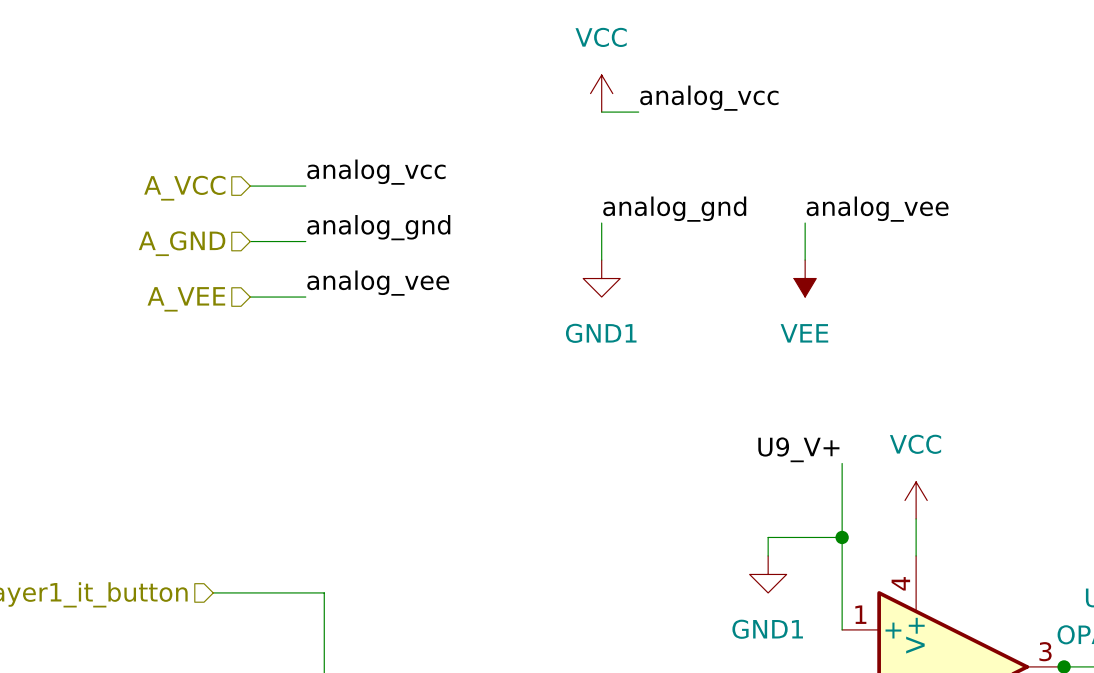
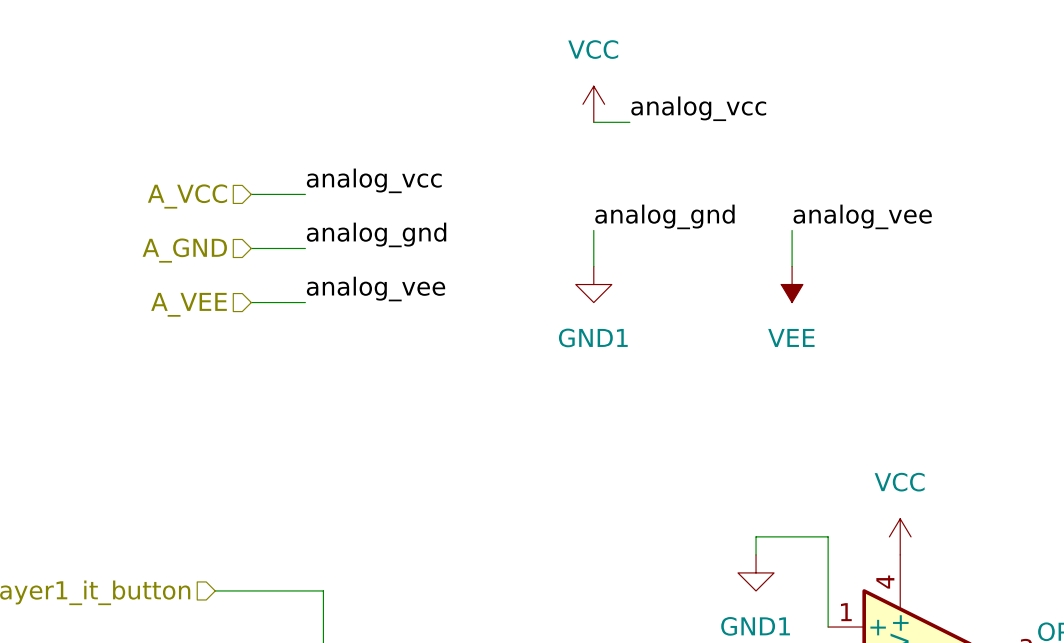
label: U9_V+ (798, 449) -> none
wire: (842, 463) (842, 537) -> none
power symbol position: VCC (916, 500) -> VCC (900, 536)
junction: (842, 537) -> none

